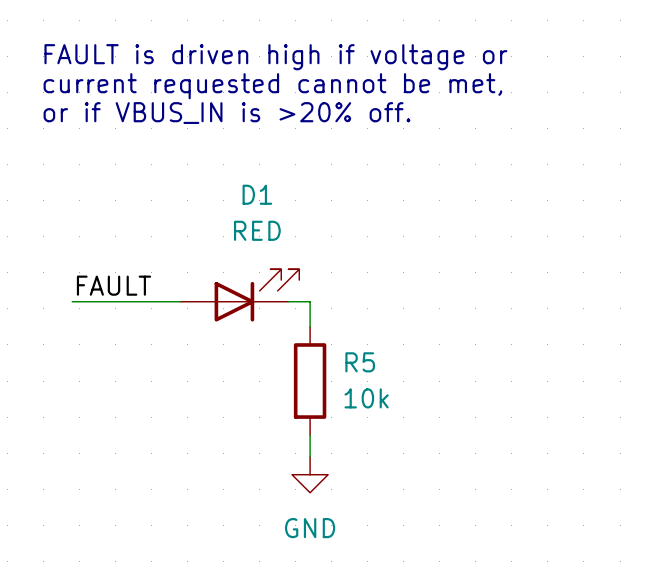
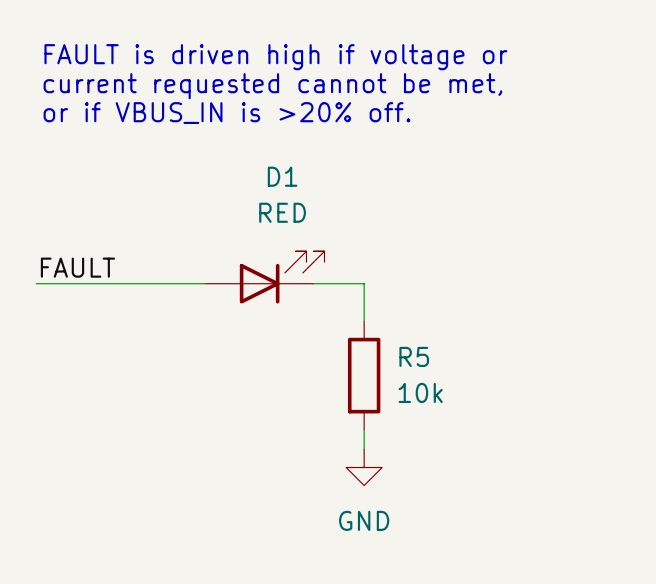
wire: none -> (36, 283) (205, 283)
wire: none -> (313, 283) (364, 283) (364, 321)
label position: FAULT (113, 285) -> FAULT (77, 267)
D1 position: (239, 295) -> (265, 277)
wire: (72, 301) (180, 301) -> none
wire: (288, 301) (310, 301) (310, 326) -> none
R5 position: (310, 381) -> (364, 375)
wire: none -> (364, 429) (364, 449)
wire: (310, 435) (310, 456) -> none
power symbol position: GND (310, 474) -> GND (364, 467)

